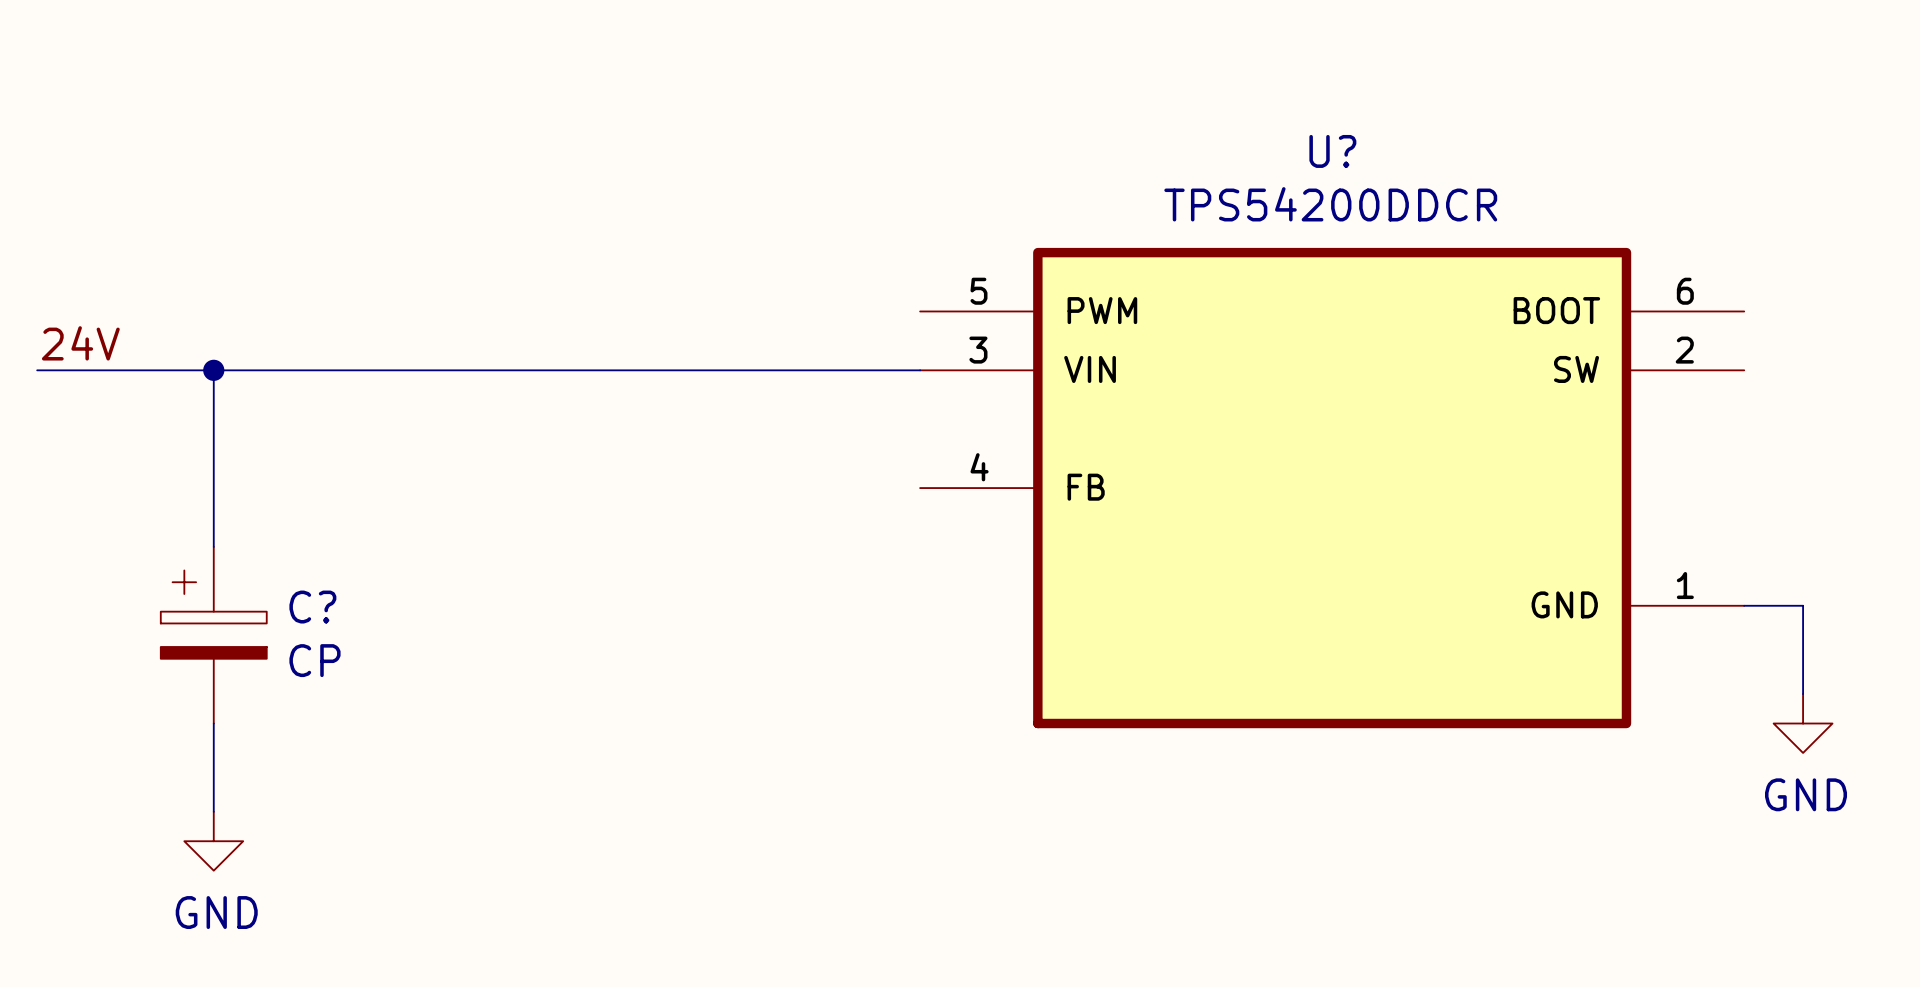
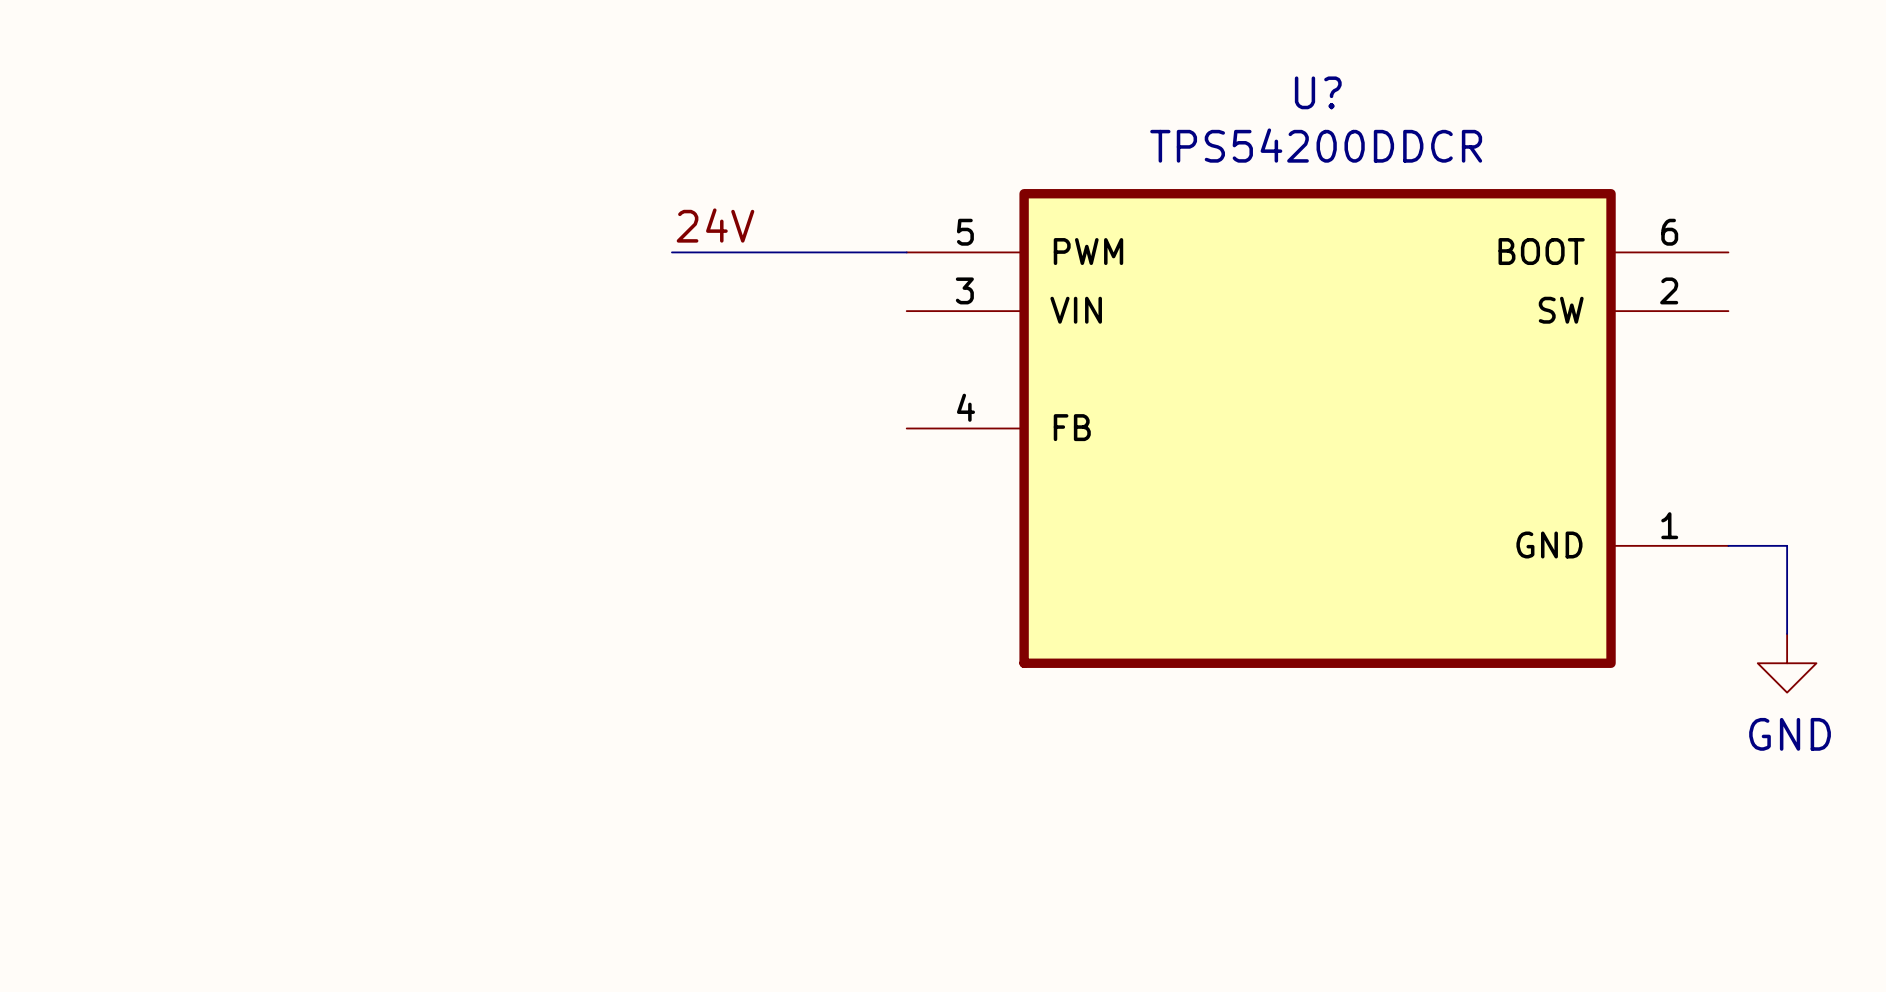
label: none -> 24V (715, 225)
wire: none -> (671, 252) (906, 252)
label: 24V (80, 343) -> none
wire: (37, 370) (920, 370) -> none
wire: (213, 370) (213, 546) -> none
junction: (213, 370) -> none
C?: CP (213, 635) -> none
wire: (213, 723) (213, 811) -> none
power symbol: GND (213, 841) -> none

